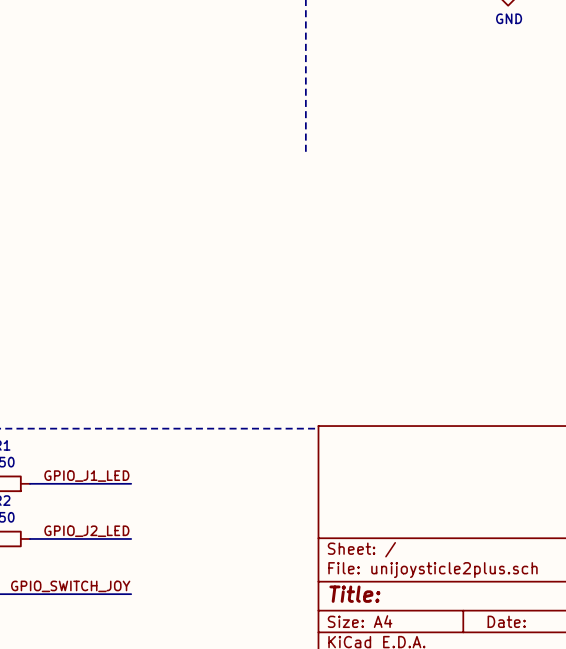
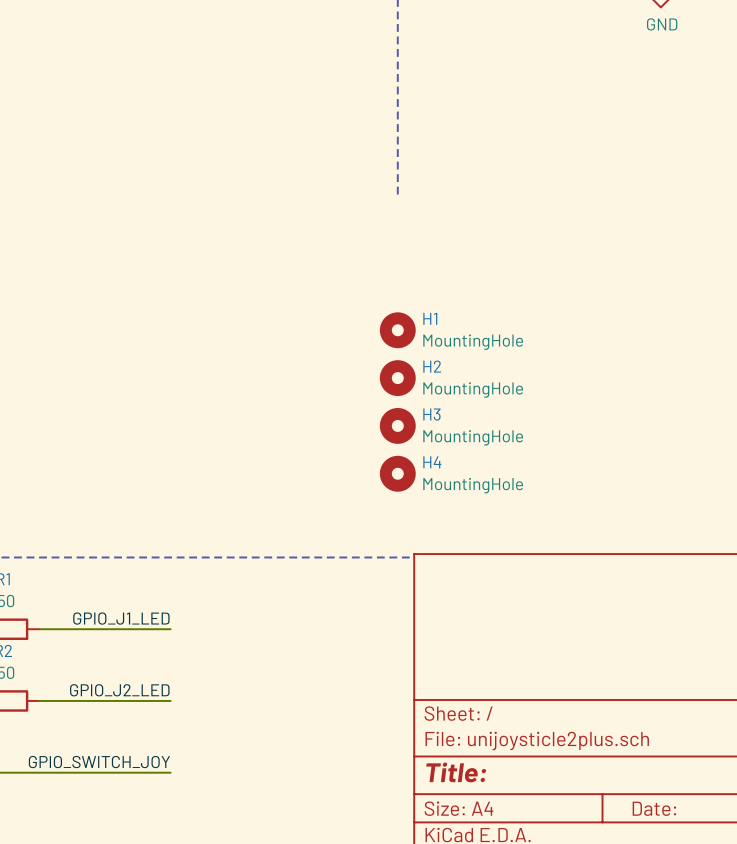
H1: none -> MountingHole (397, 330)
H2: none -> MountingHole (397, 378)
H3: none -> MountingHole (397, 425)
H4: none -> MountingHole (397, 473)

